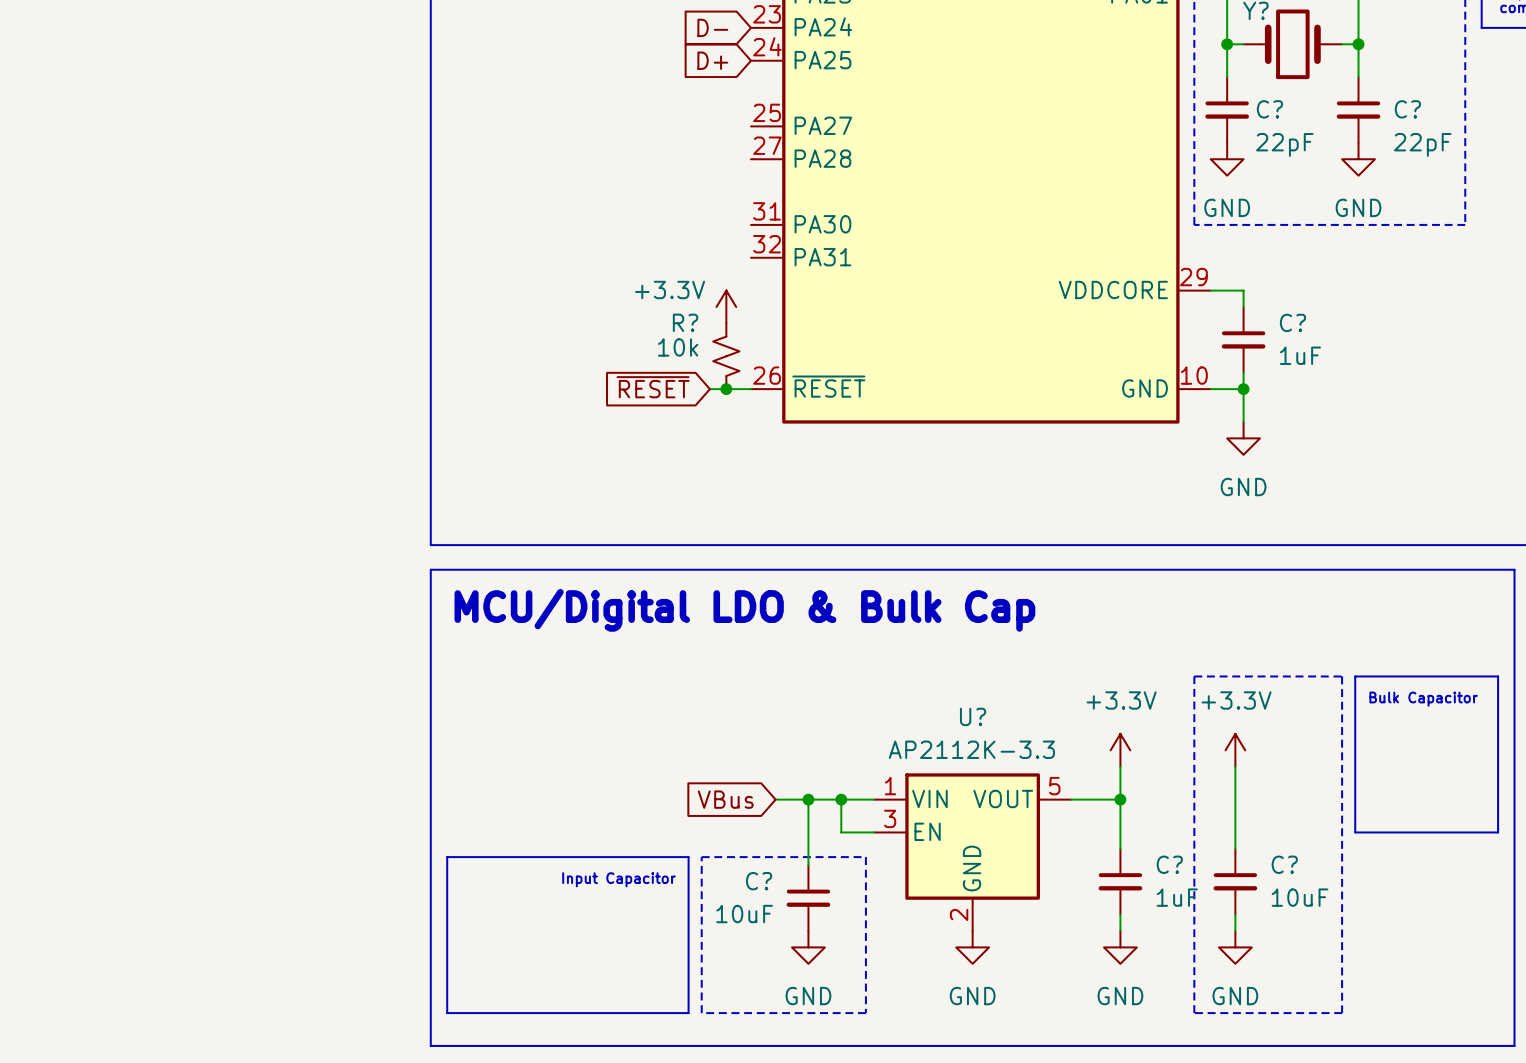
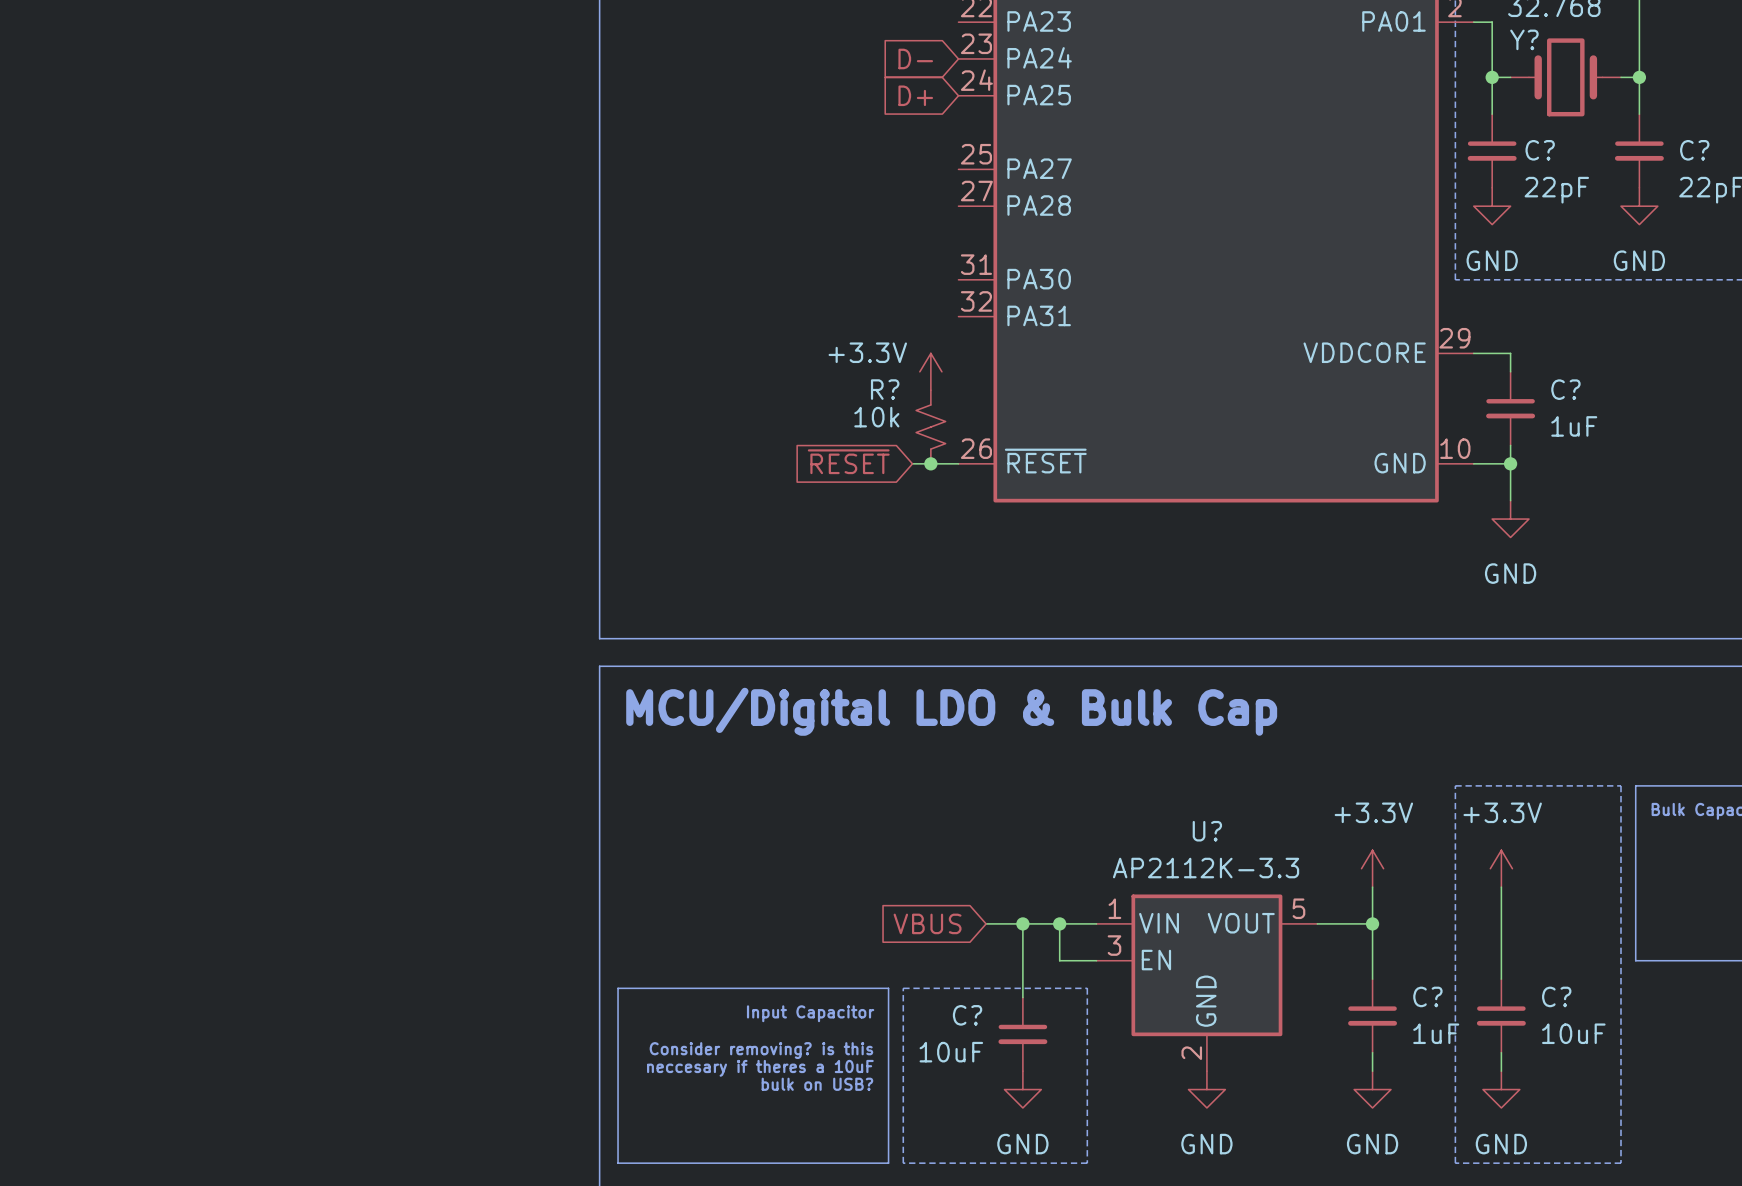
global label: VBus (725, 799) -> VBUS (927, 923)
text: none -> Consider removing? is this (761, 1050)
text: none -> neccesary if theres a 10uF (760, 1068)
text: none -> bulk on USB? (817, 1084)

